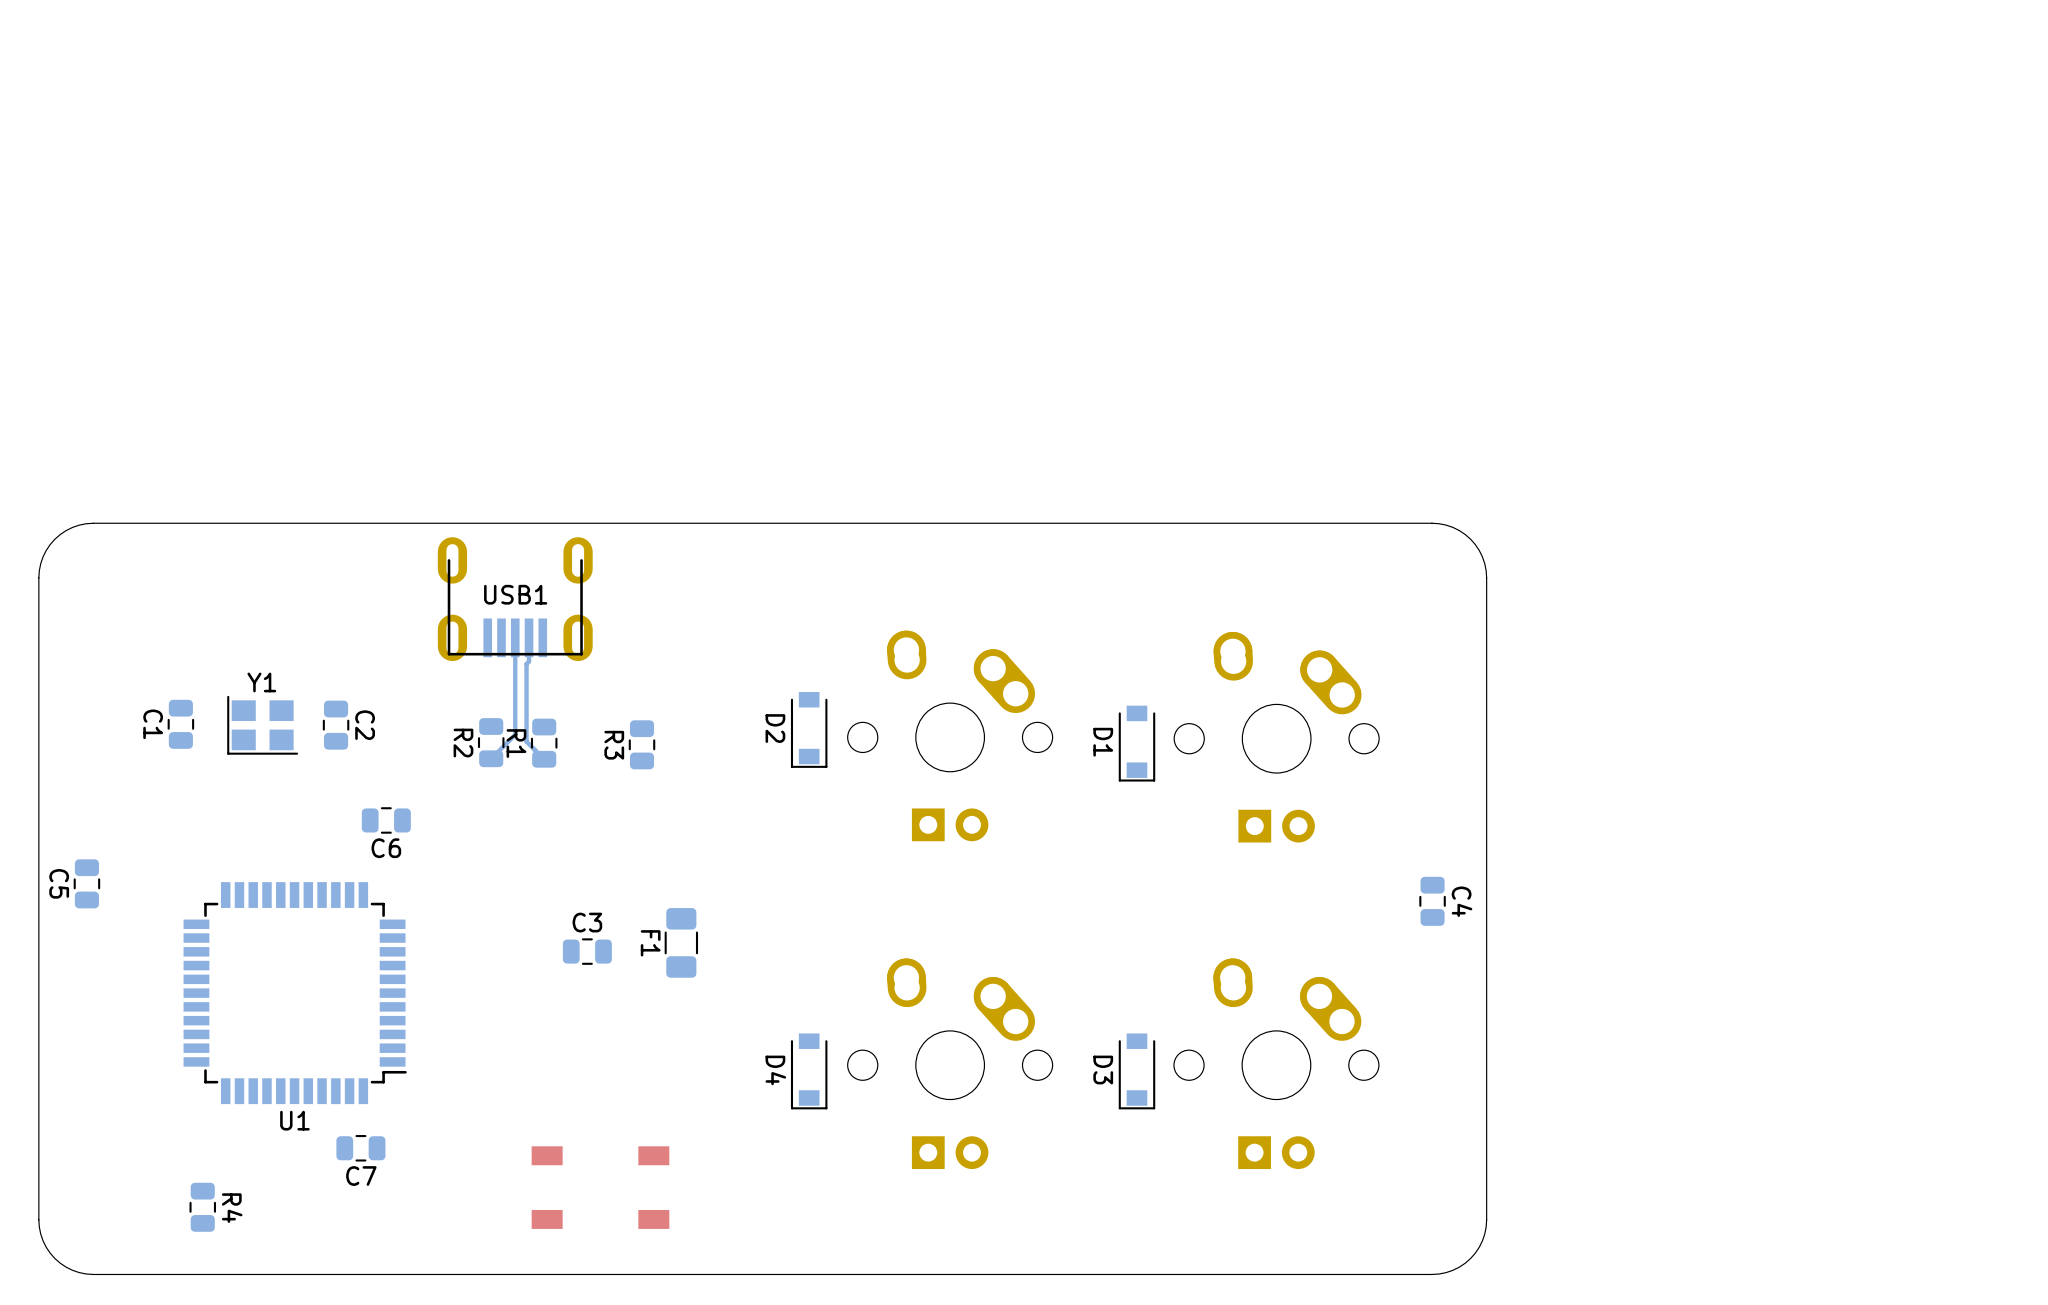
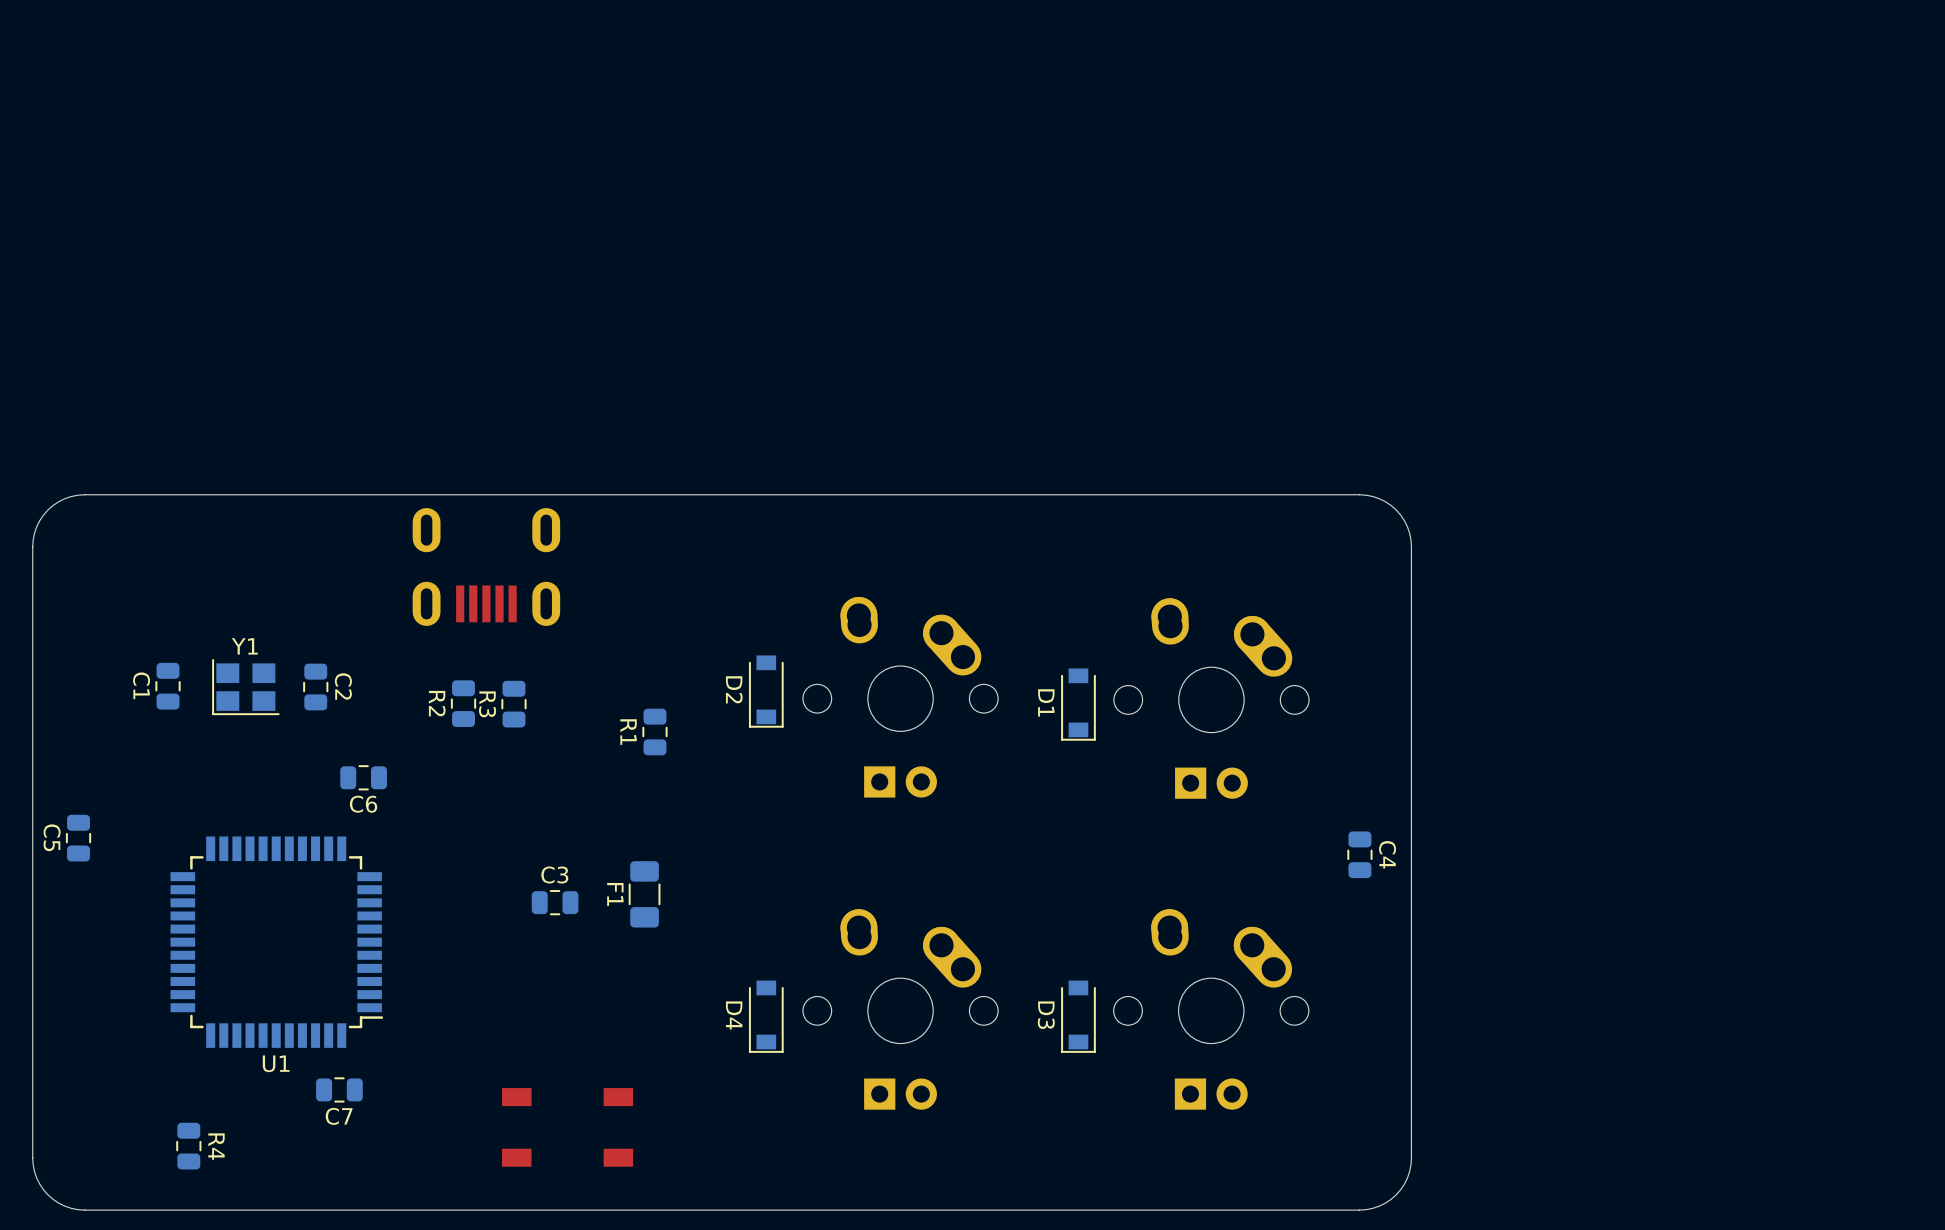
USB1 side: bottom (515, 599) -> top (486, 567)
bottom track: (515, 637) (515, 734) (491, 758) -> none
bottom track: (529, 637) (529, 661) (526, 664) (526, 741) (544, 759) -> none
R1 name: R1 (516, 743) -> R3 (487, 704)
R3: (642, 744) -> none
R1: none -> (654, 731)

